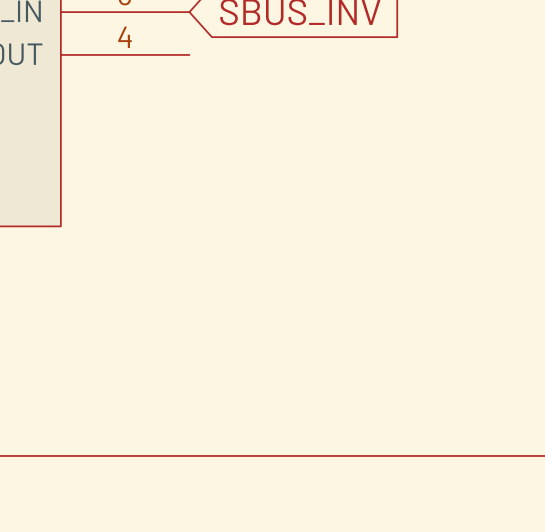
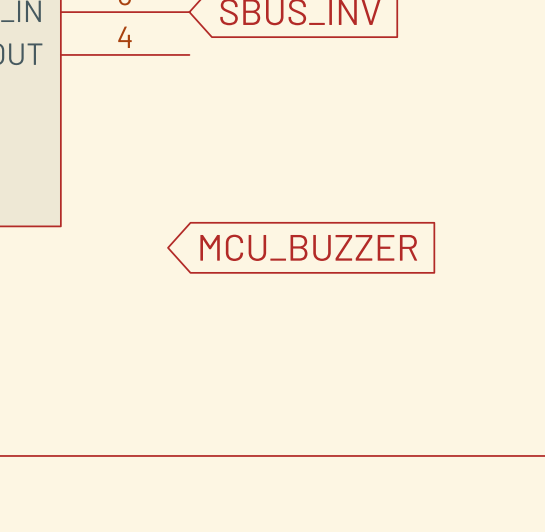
global label: none -> MCU_BUZZER (308, 247)

